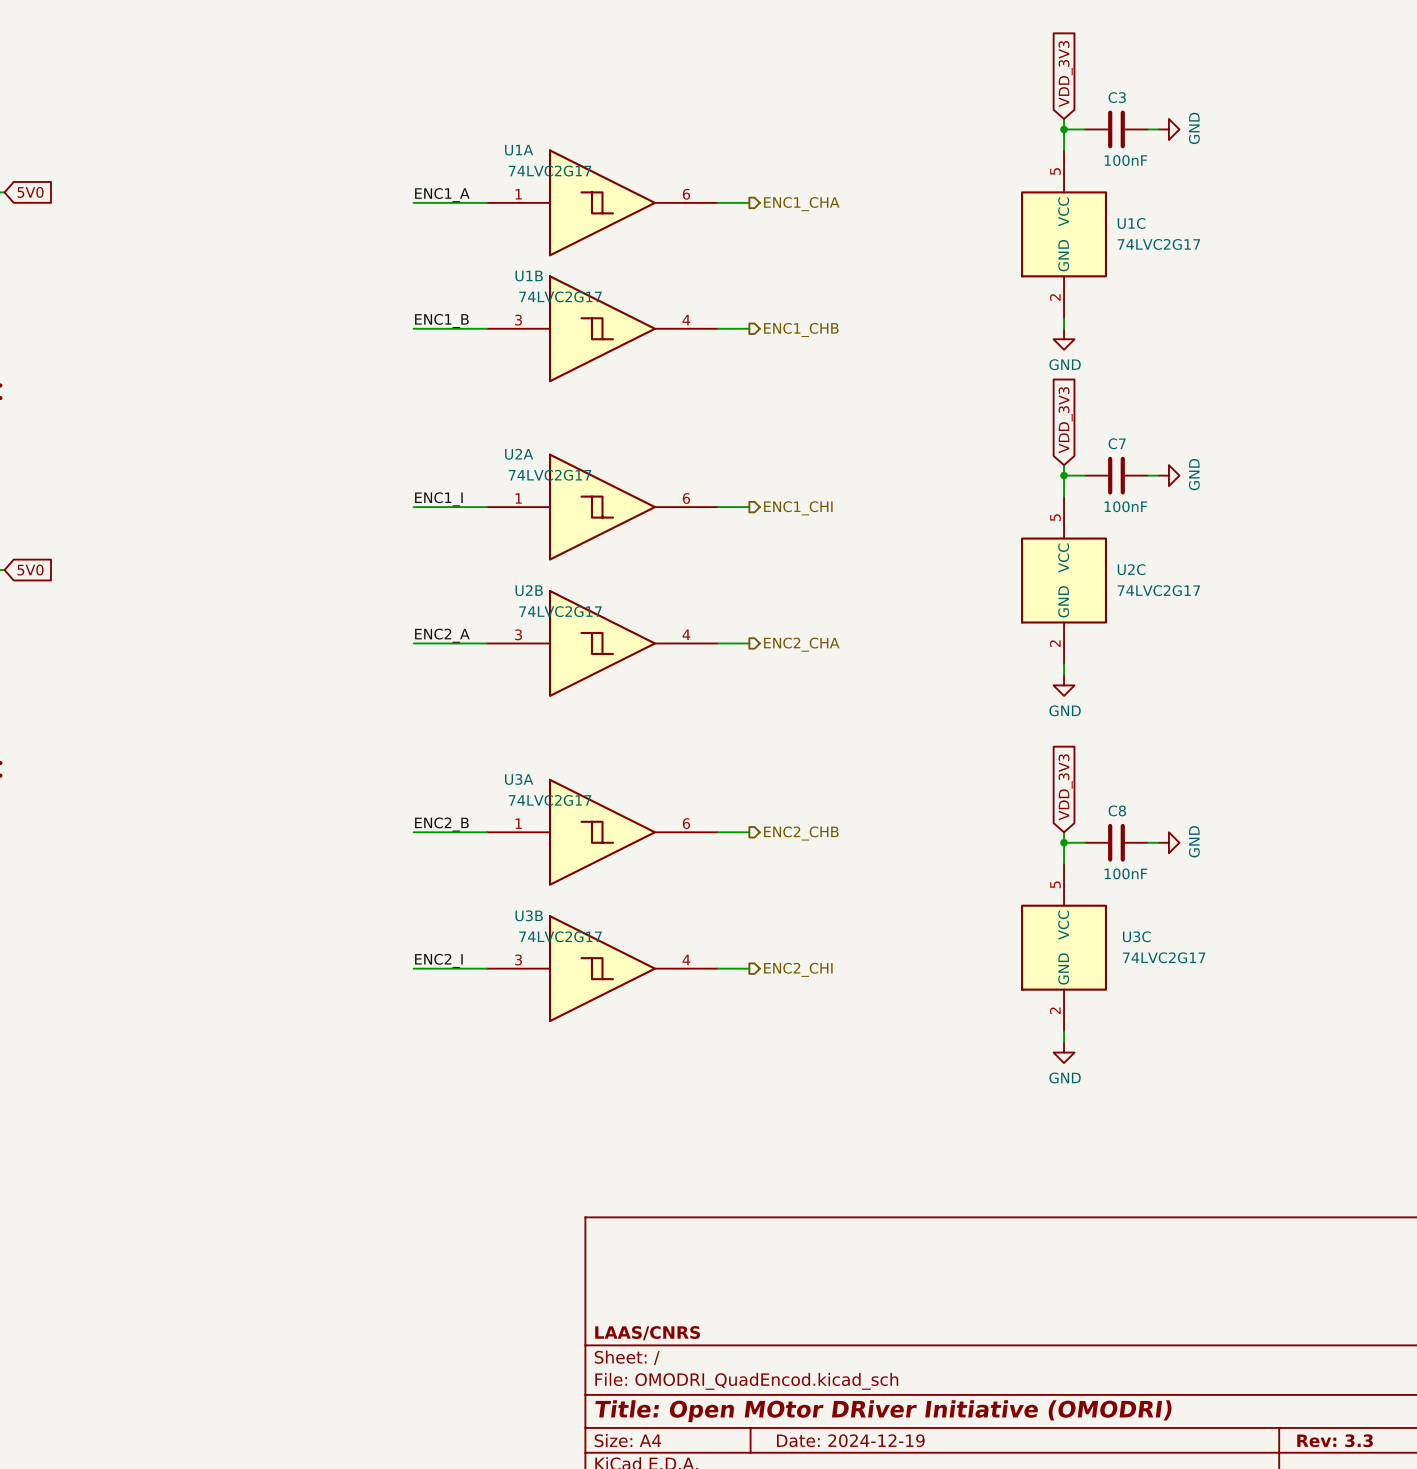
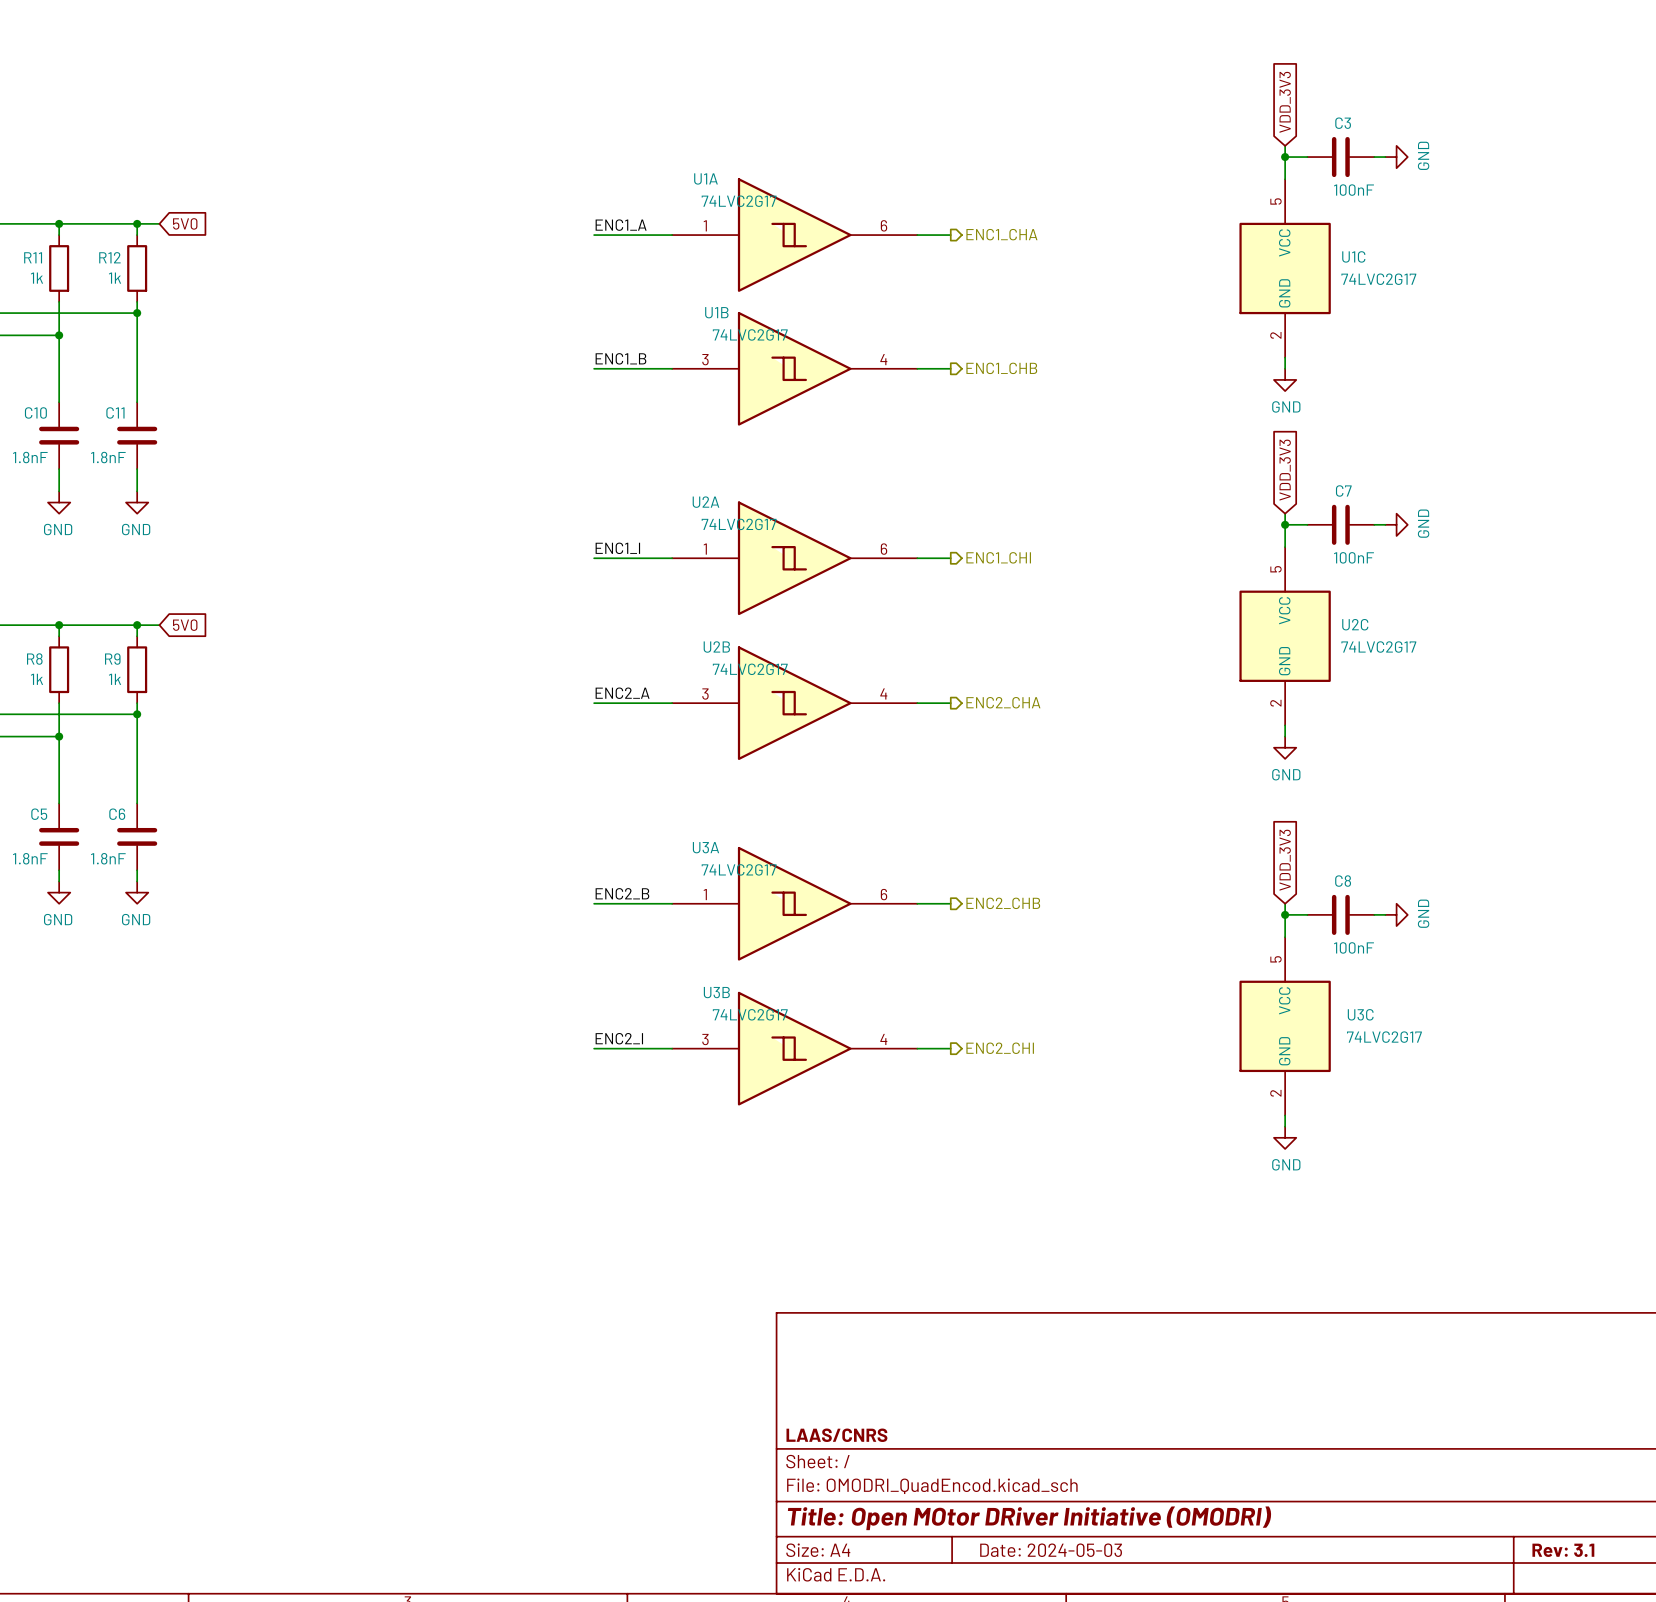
title block: Date: 2024-12-19 (850, 1440) -> Date: 2024-05-03 (1051, 1550)
title block: Rev: 3.3 (1335, 1440) -> Rev: 3.1 (1563, 1550)

